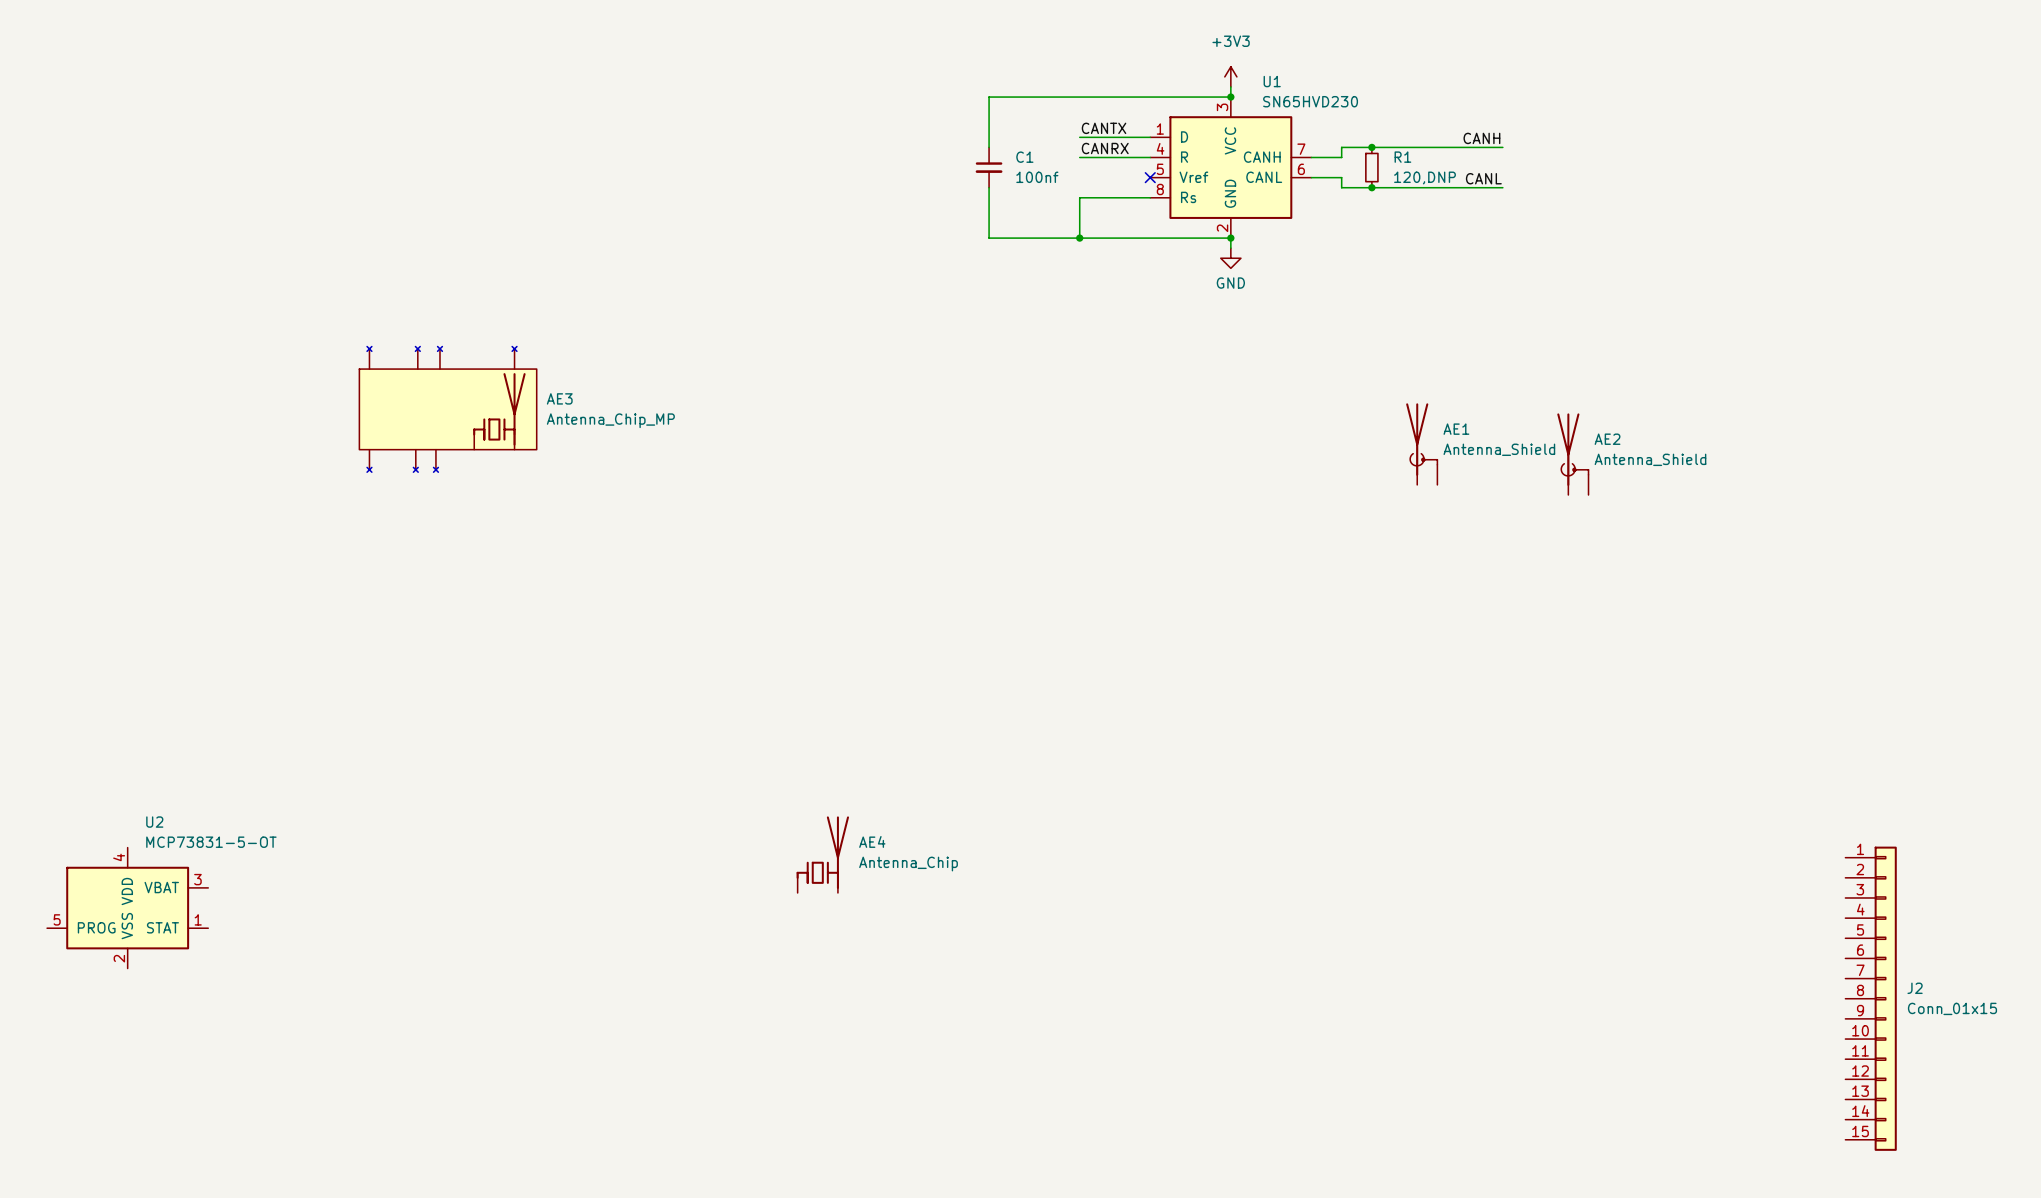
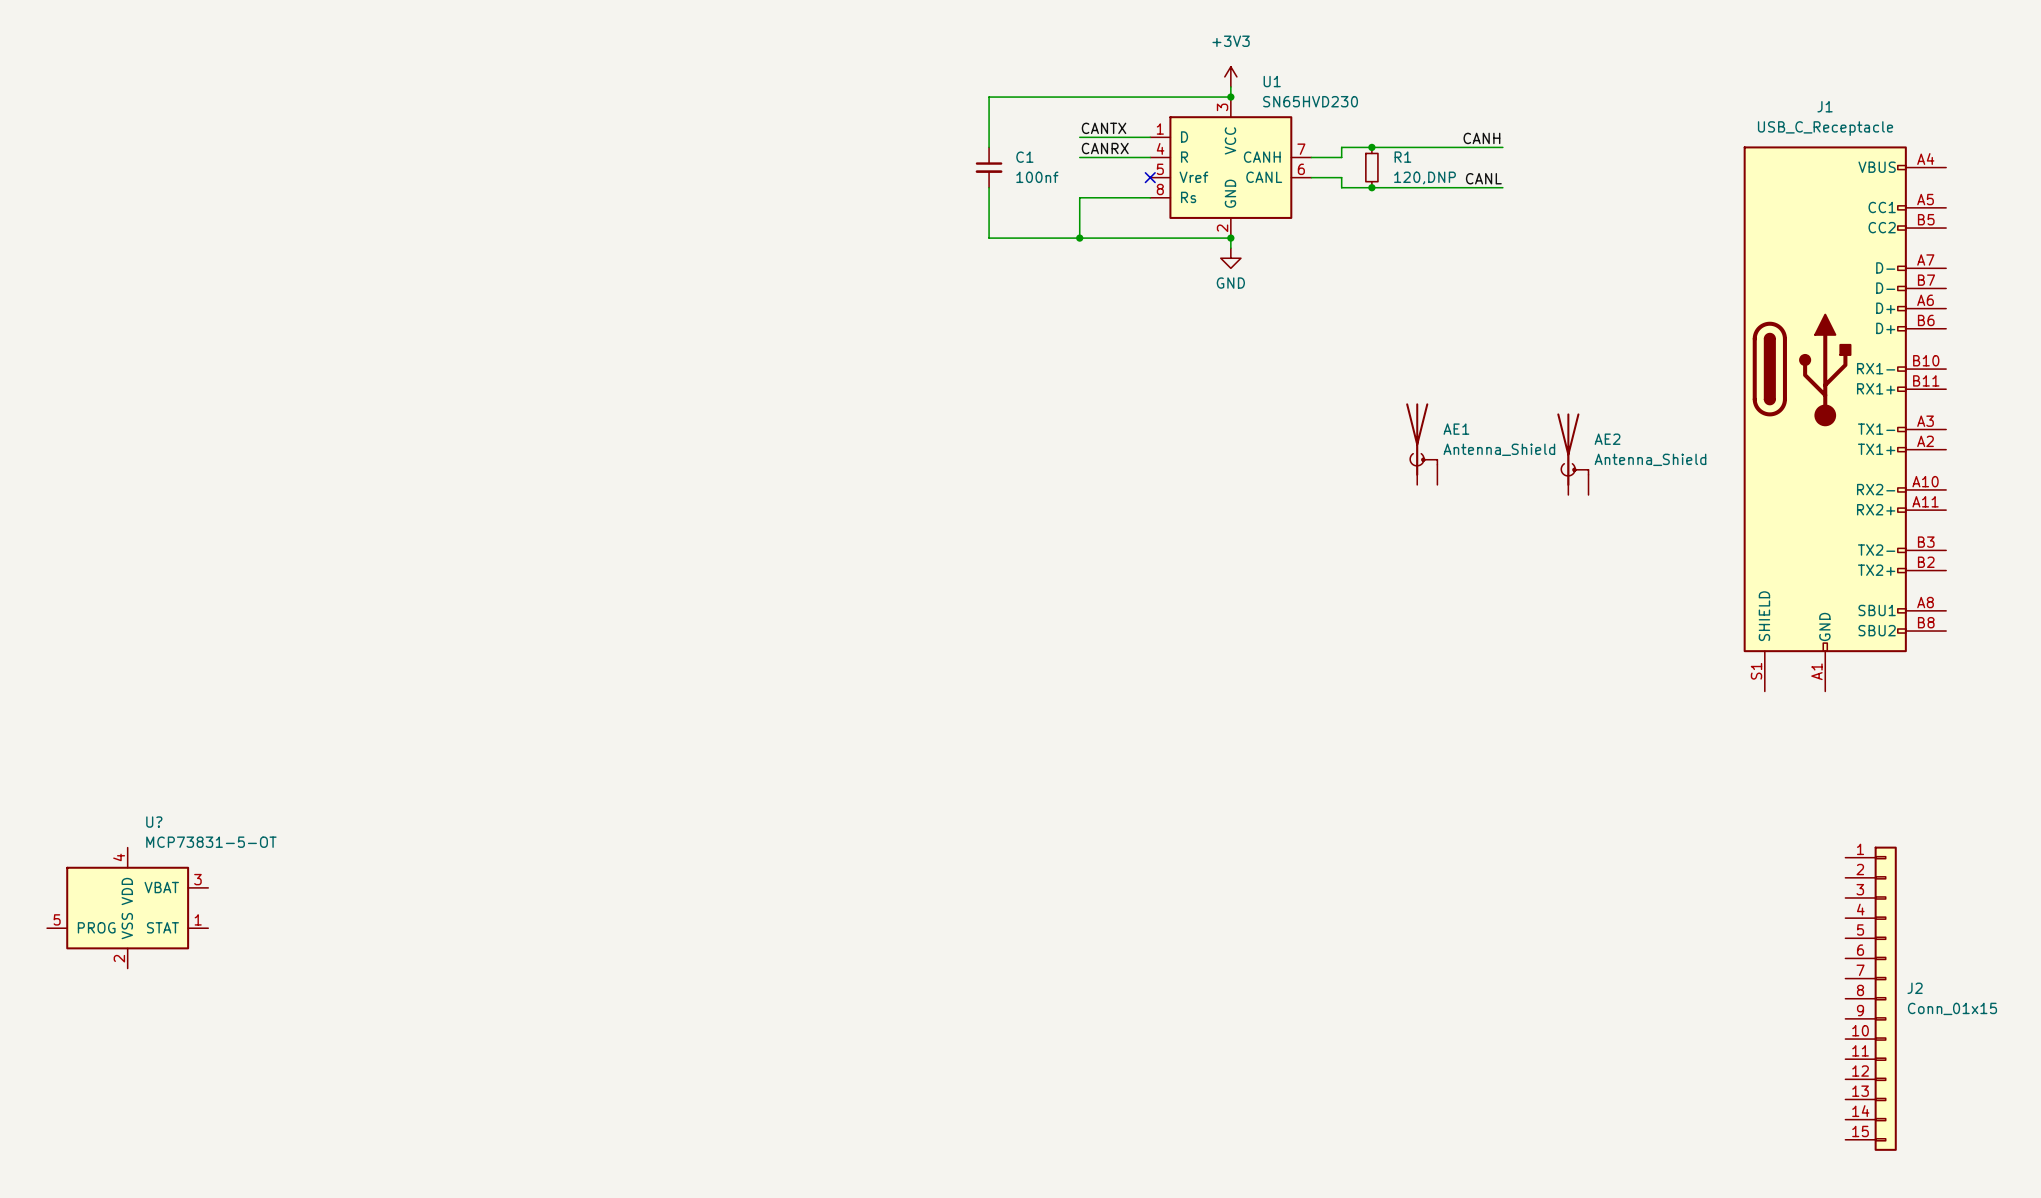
AE3: Antenna_Chip_MP (448, 409) -> none
J1: none -> USB_C_Receptacle (1844, 418)
U2 name: U2 (154, 822) -> U? (154, 822)
AE4: Antenna_Chip (822, 854) -> none

